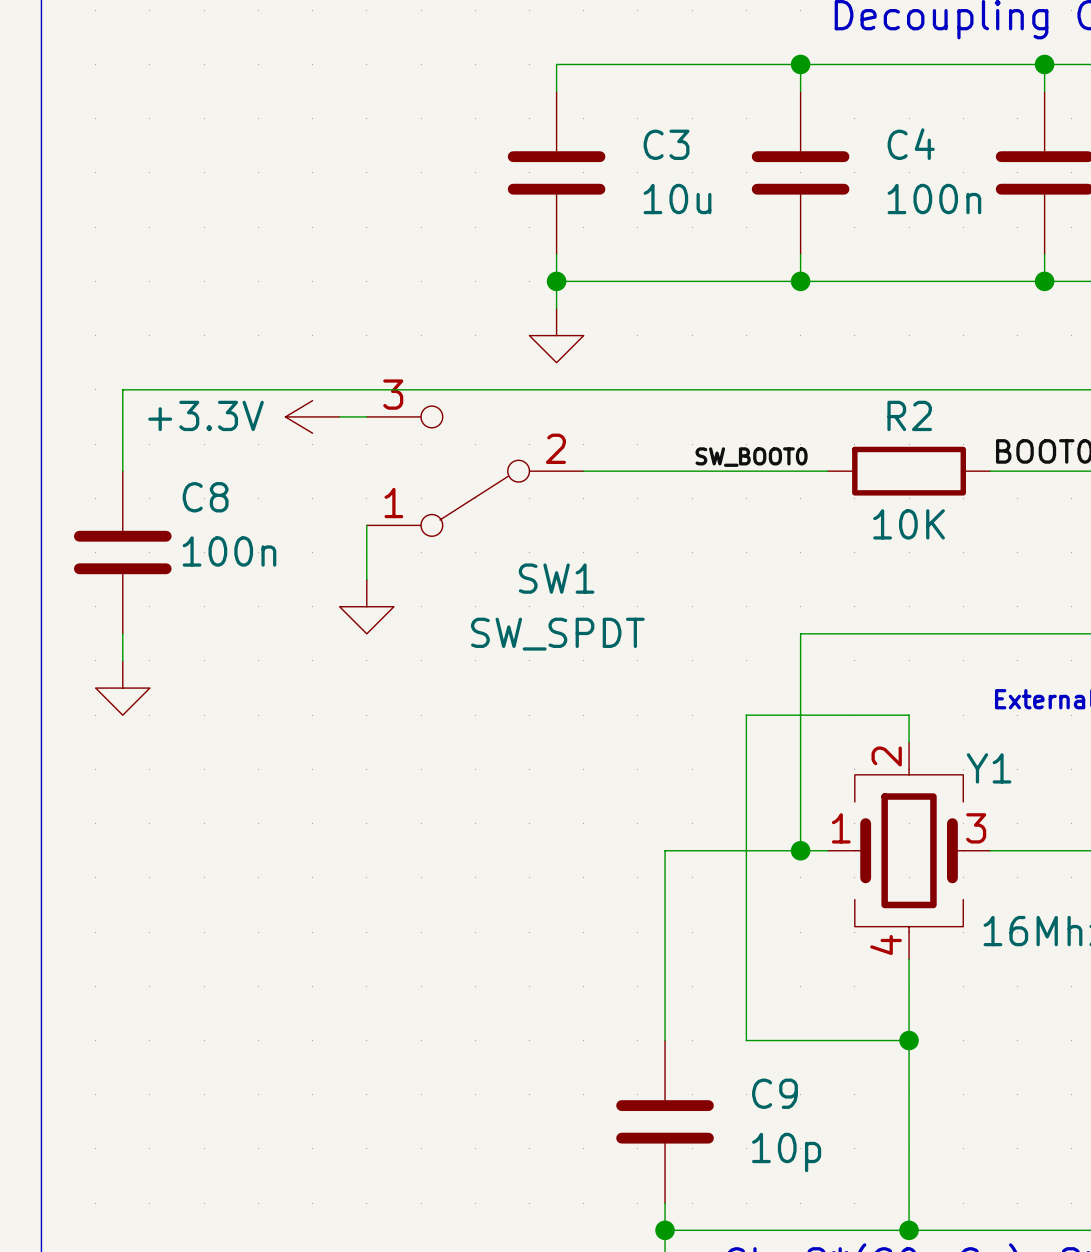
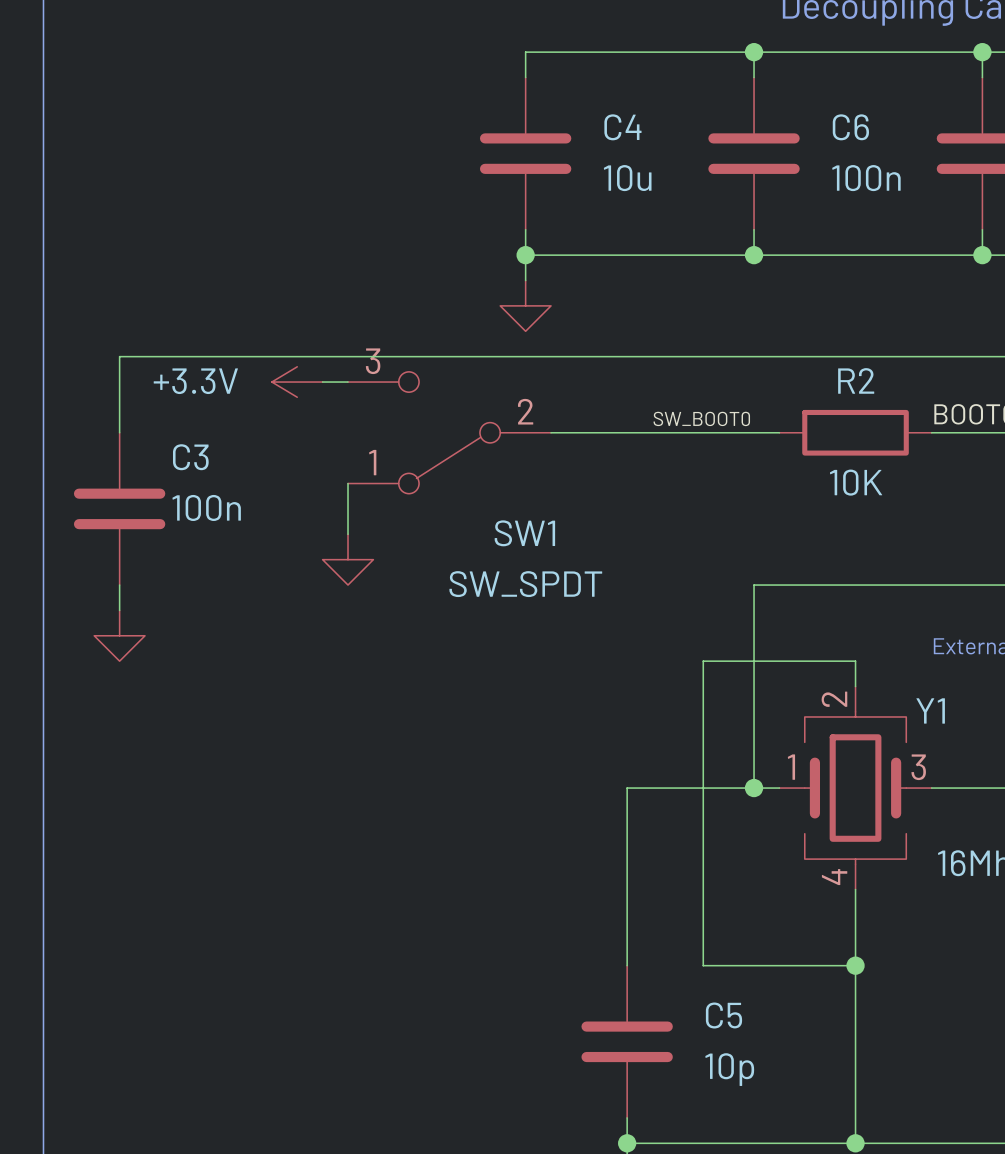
C3 name: C3 (666, 144) -> C4 (622, 127)
C4 name: C4 (911, 144) -> C6 (850, 127)
C8 name: C8 (205, 497) -> C3 (190, 457)
C9 name: C9 (774, 1093) -> C5 (723, 1015)

